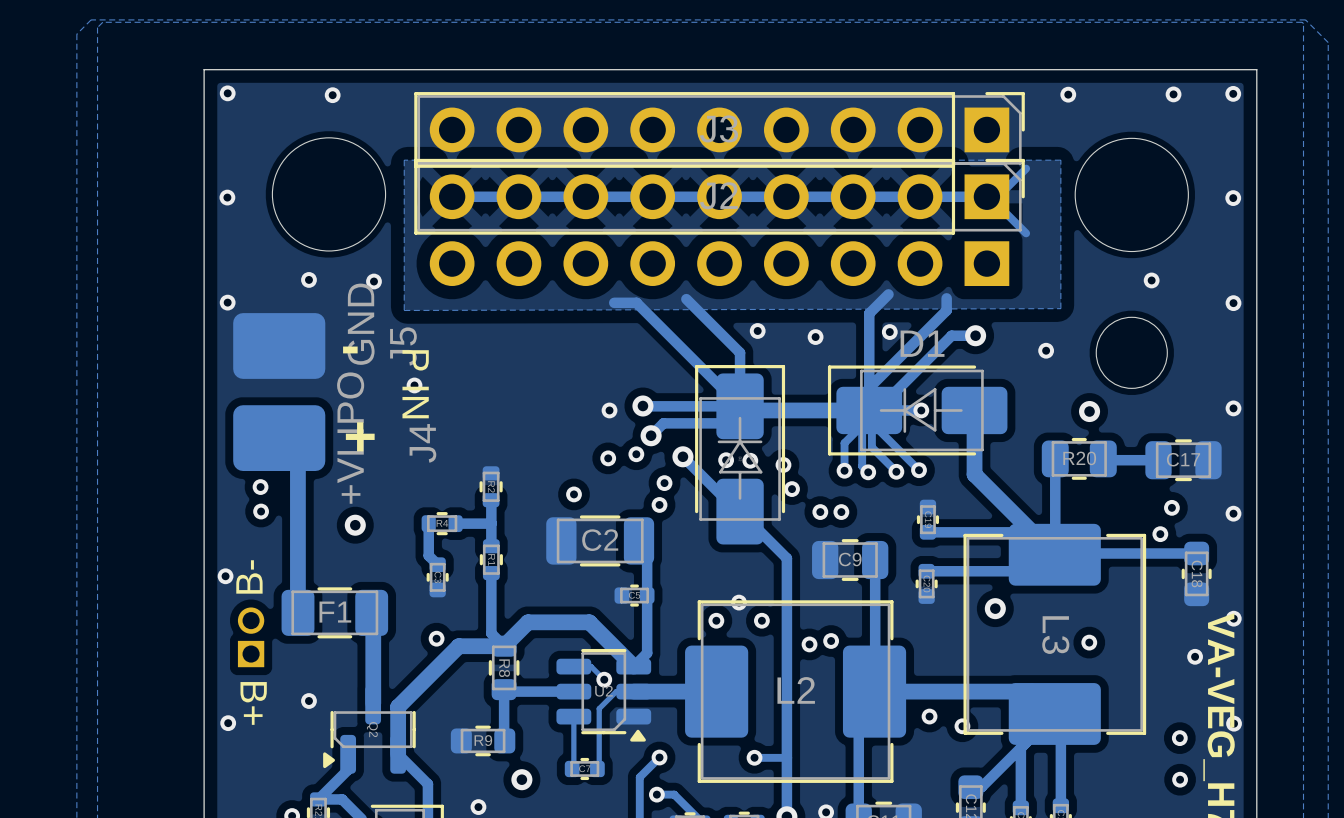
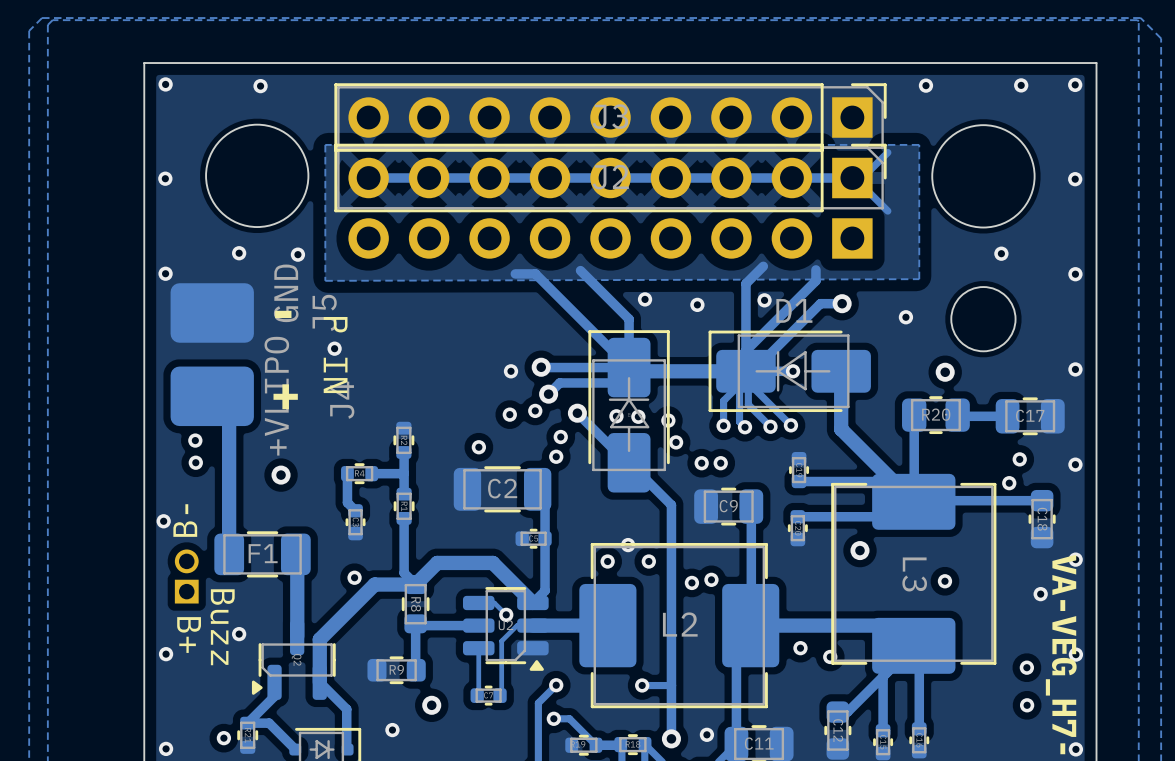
text: none -> Buzz (222, 627)

